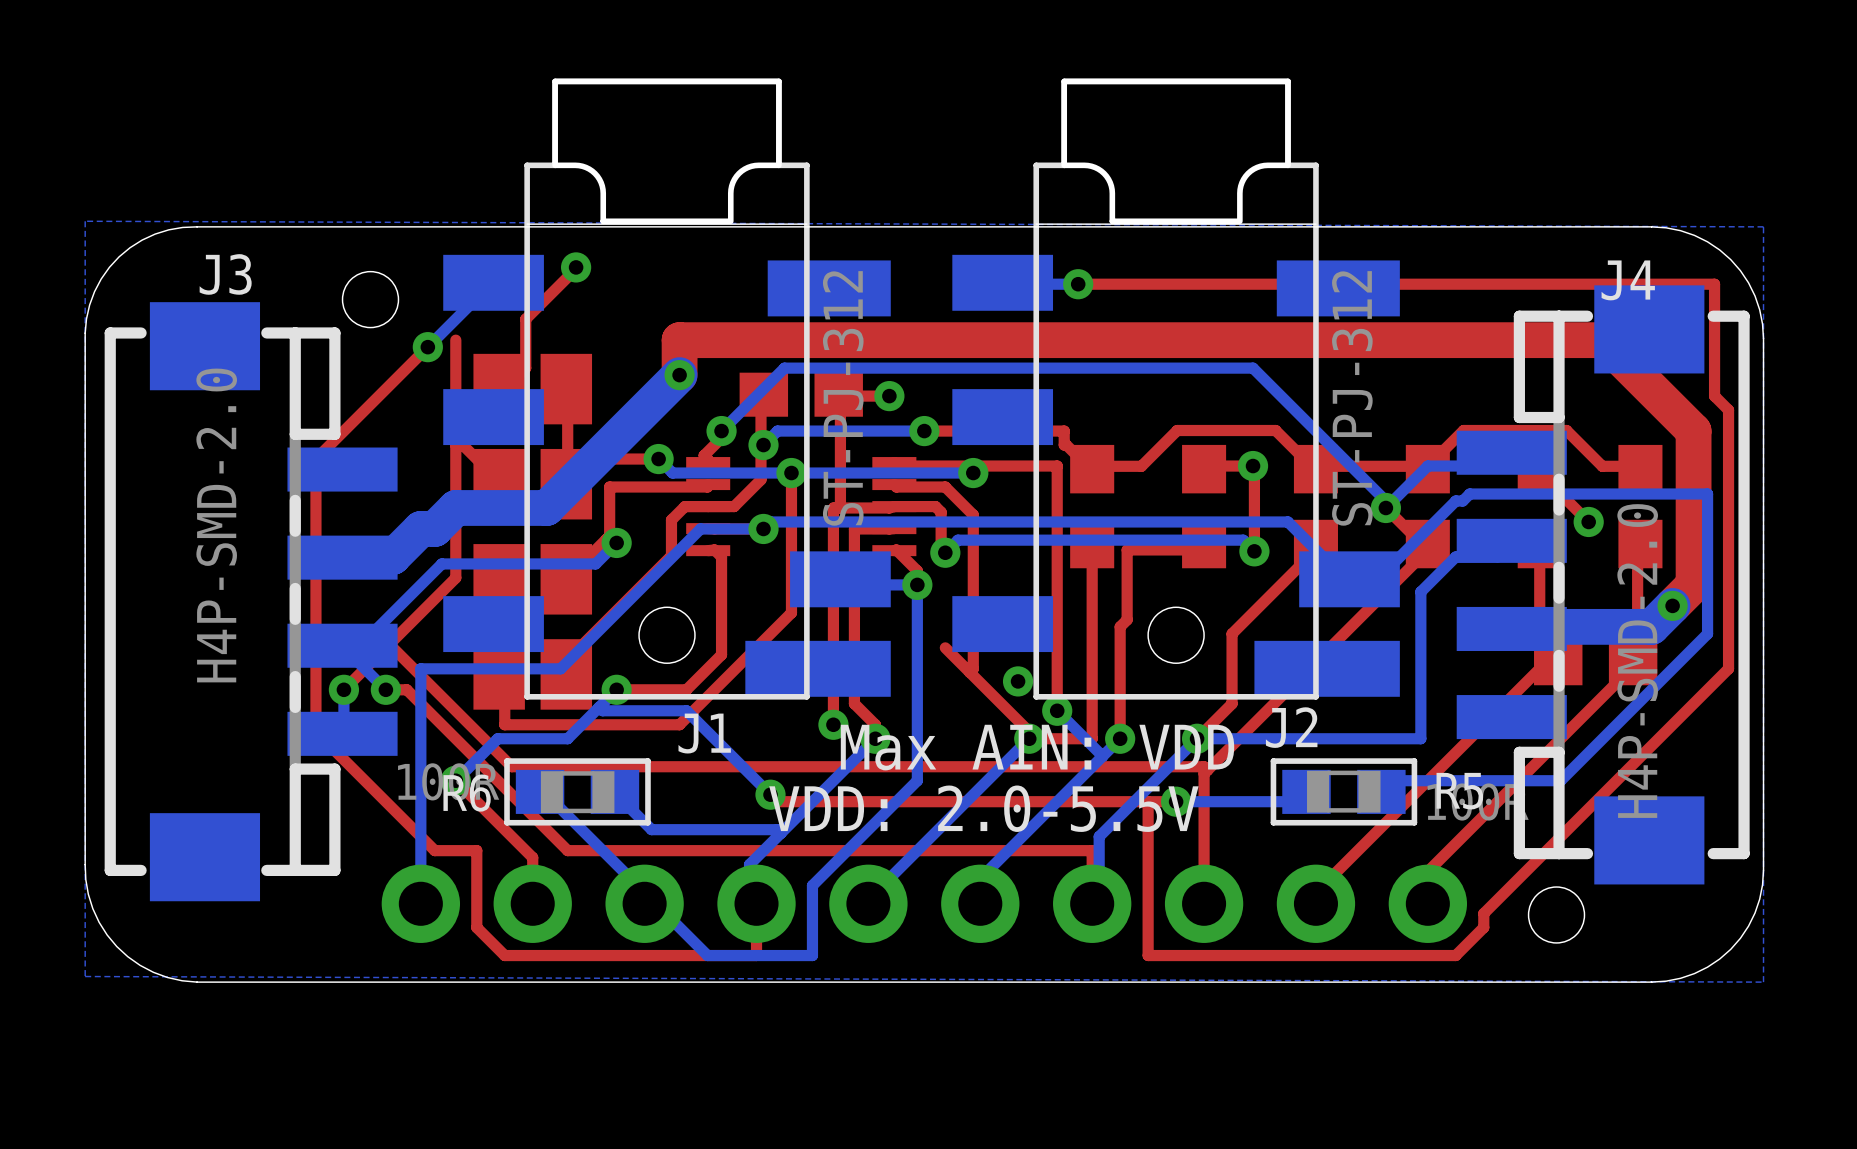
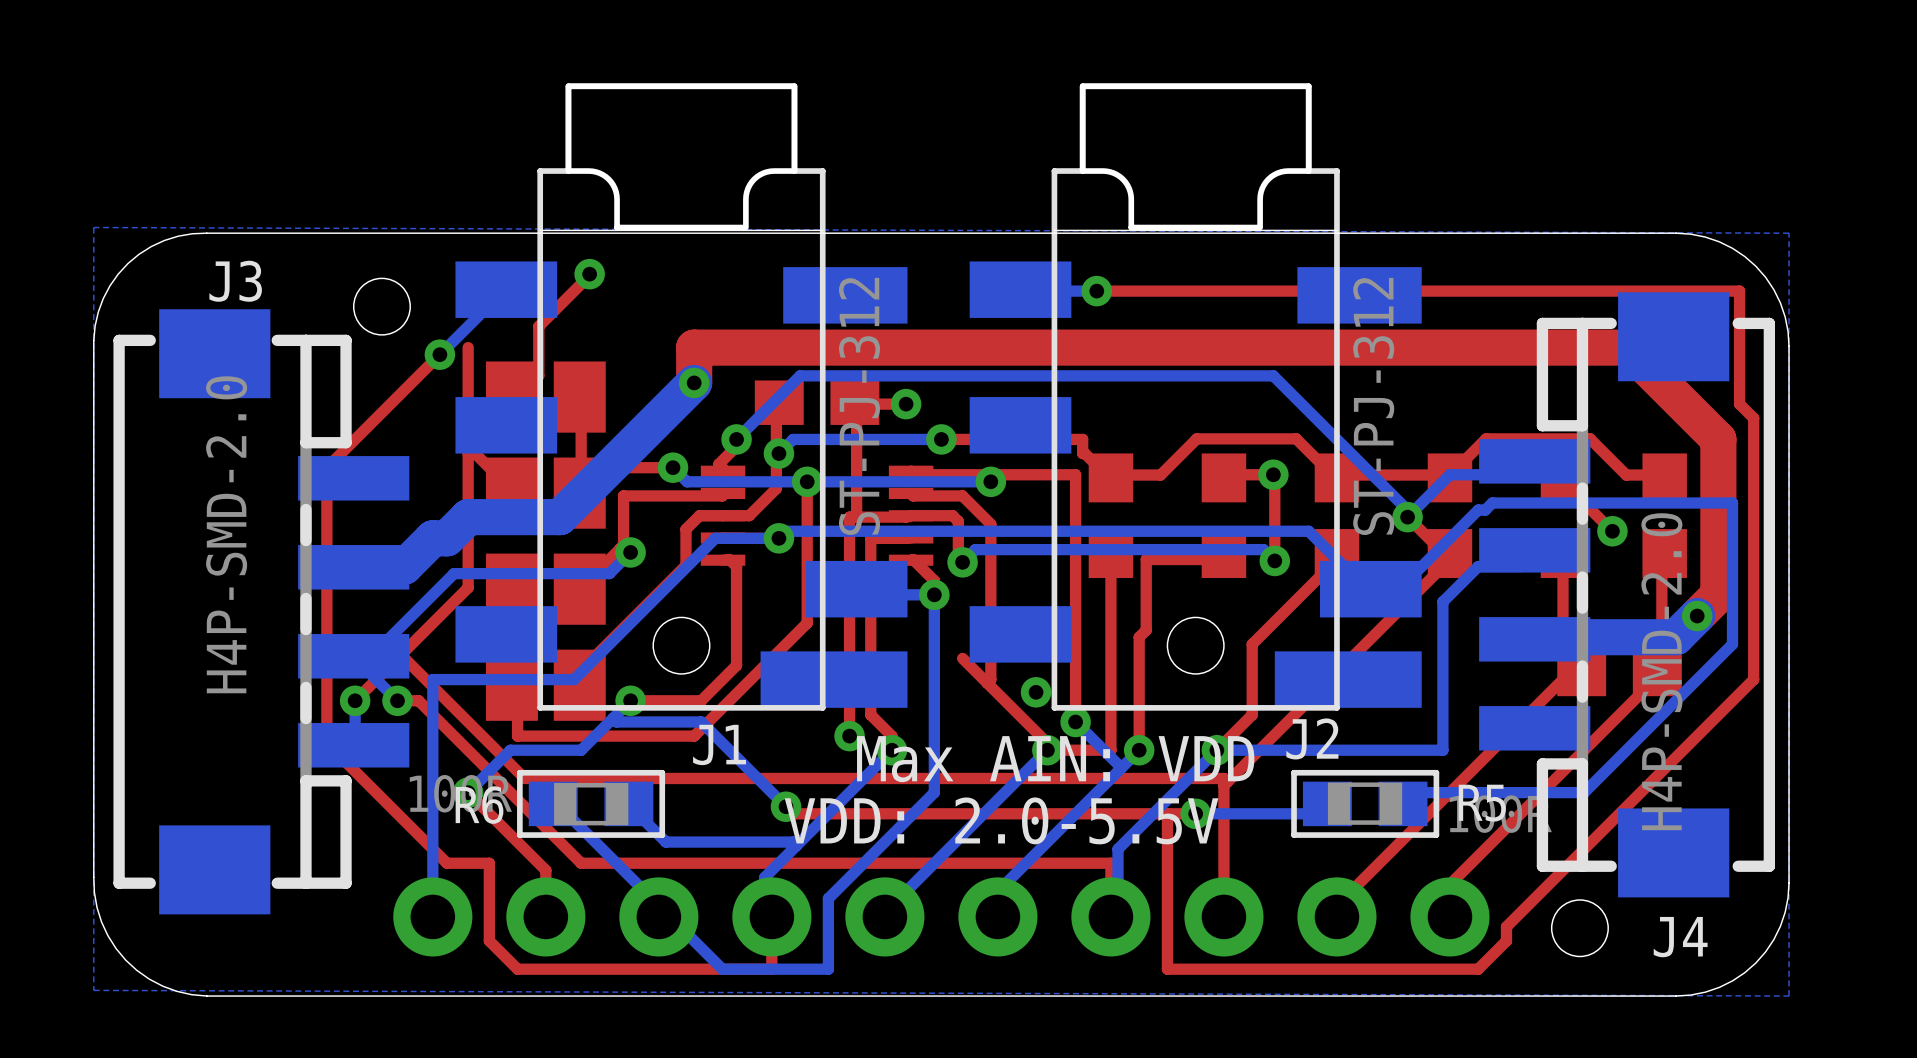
J4 name position: J4 (1628, 280) -> J4 (1680, 937)

